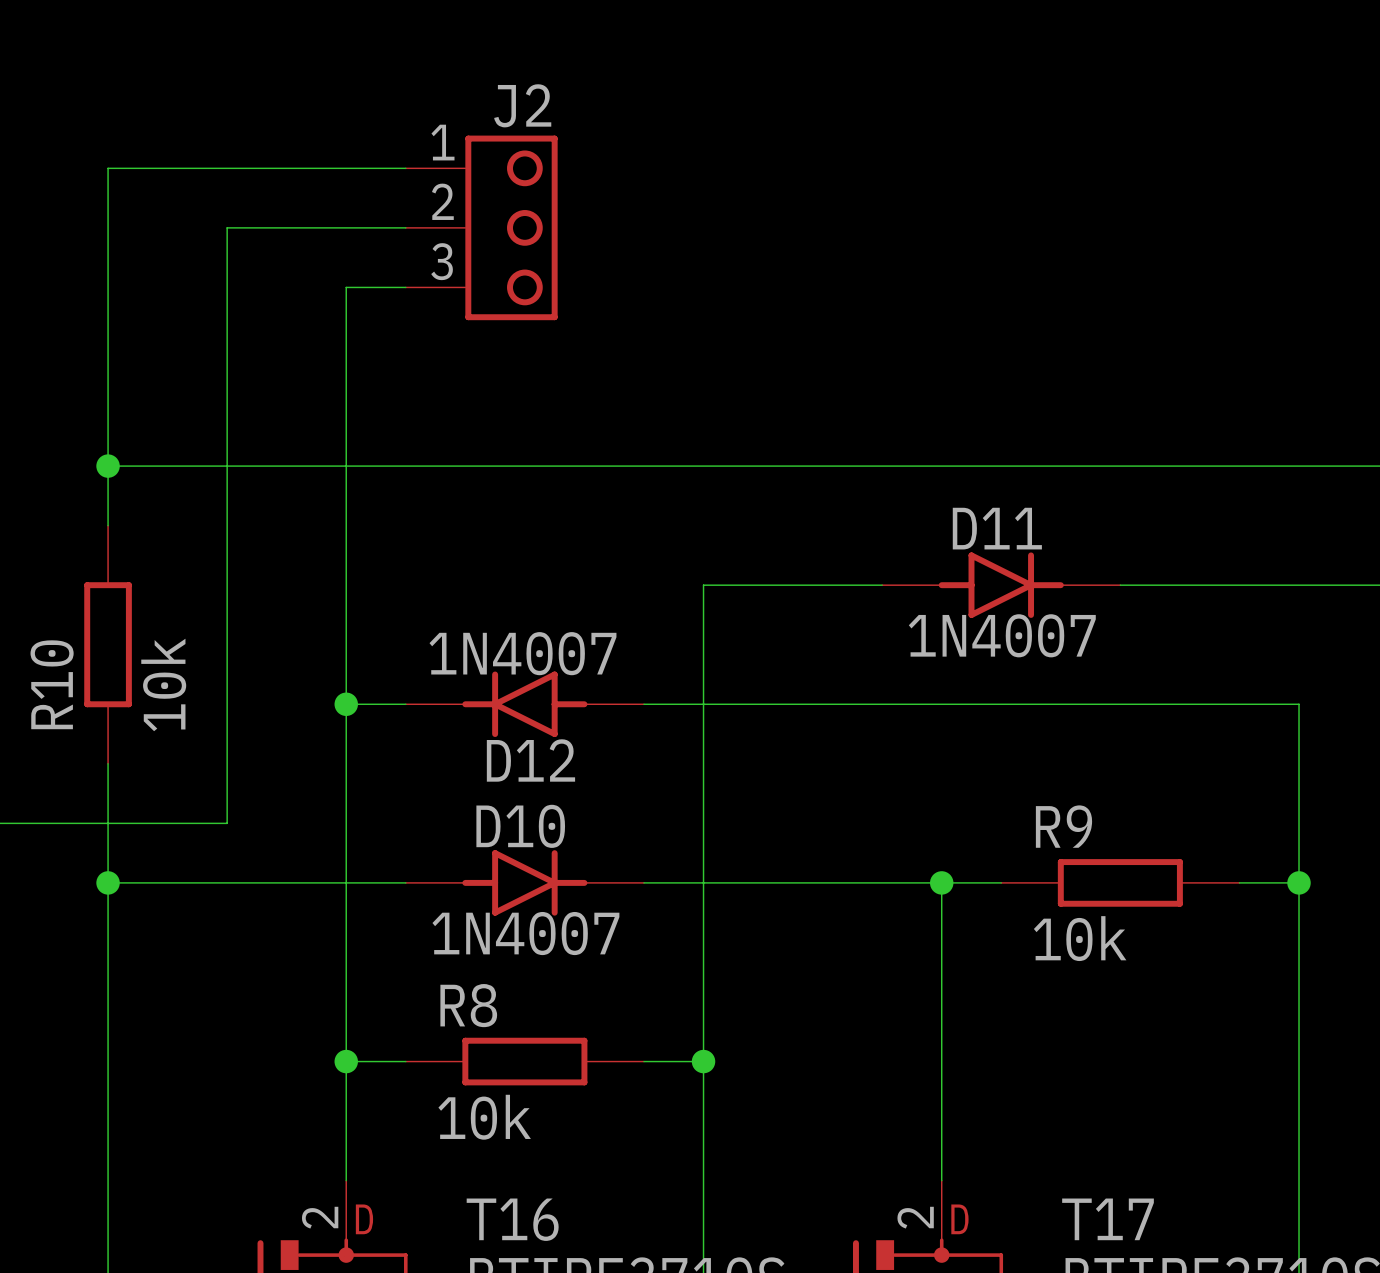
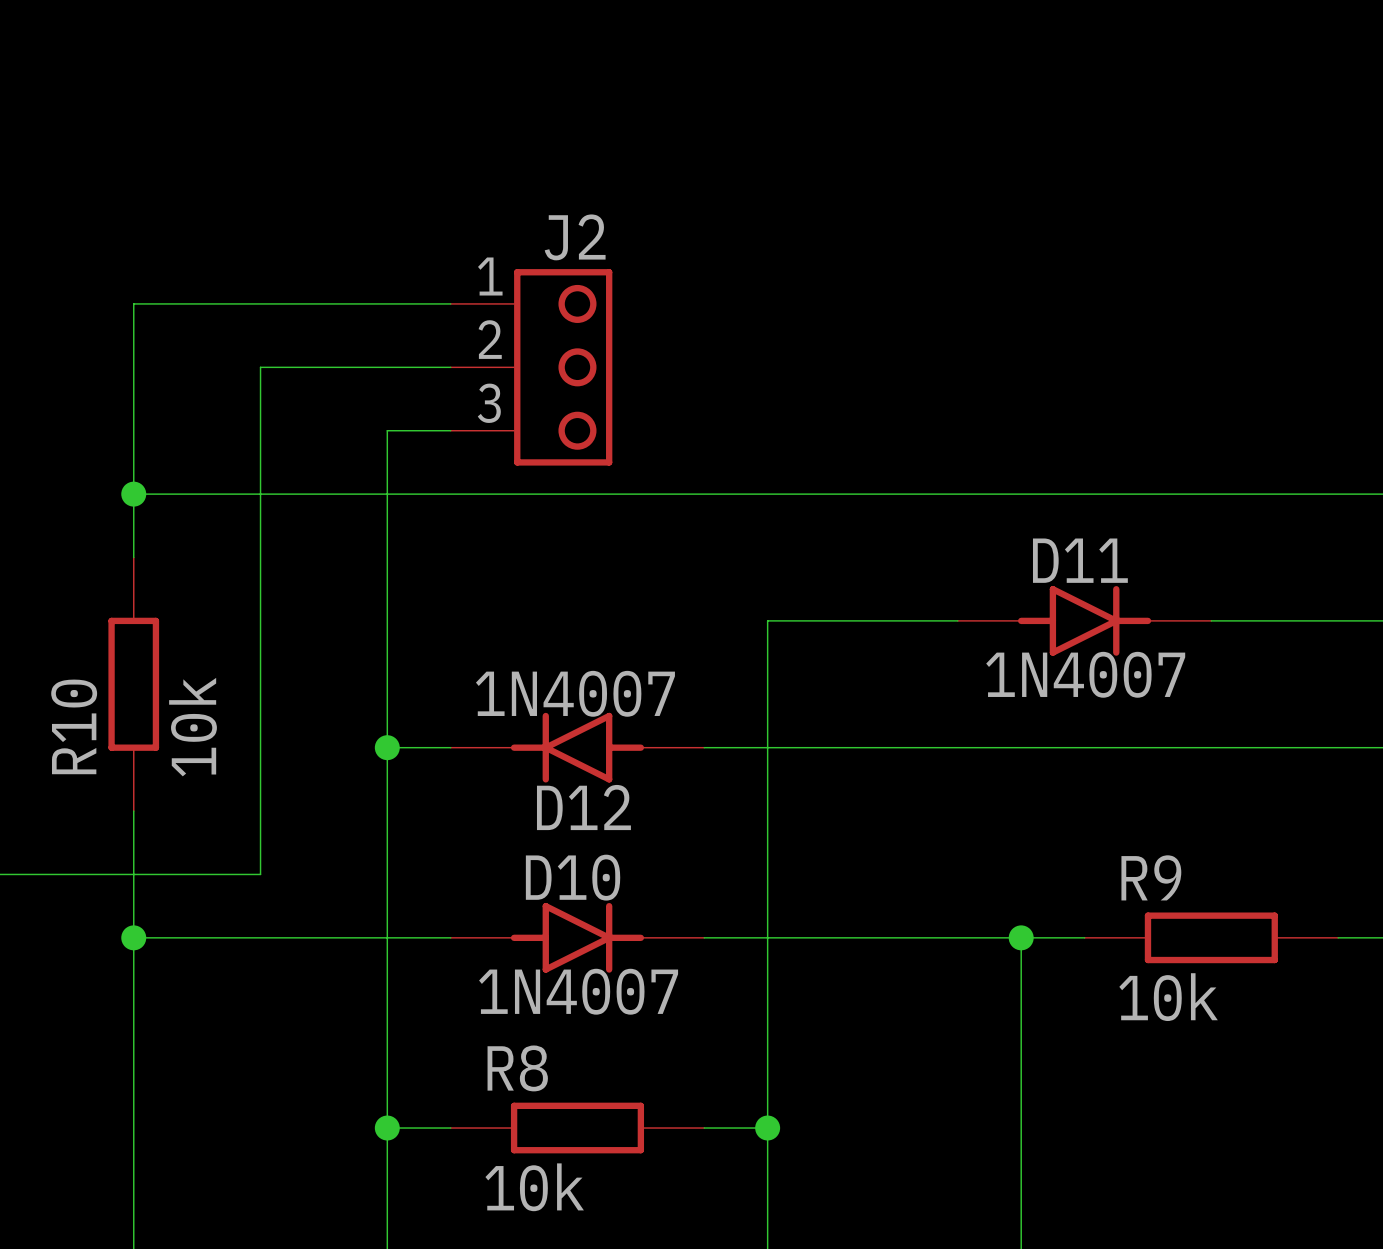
wire: (405, 168) (108, 168) (108, 287) -> (387, 303) (133, 303)
wire: (405, 227) (227, 227) (227, 346) -> (450, 367) (260, 367)
J2 position: (481, 227) -> (531, 367)
wire: (346, 287) (346, 406) -> (450, 430) (387, 430)

